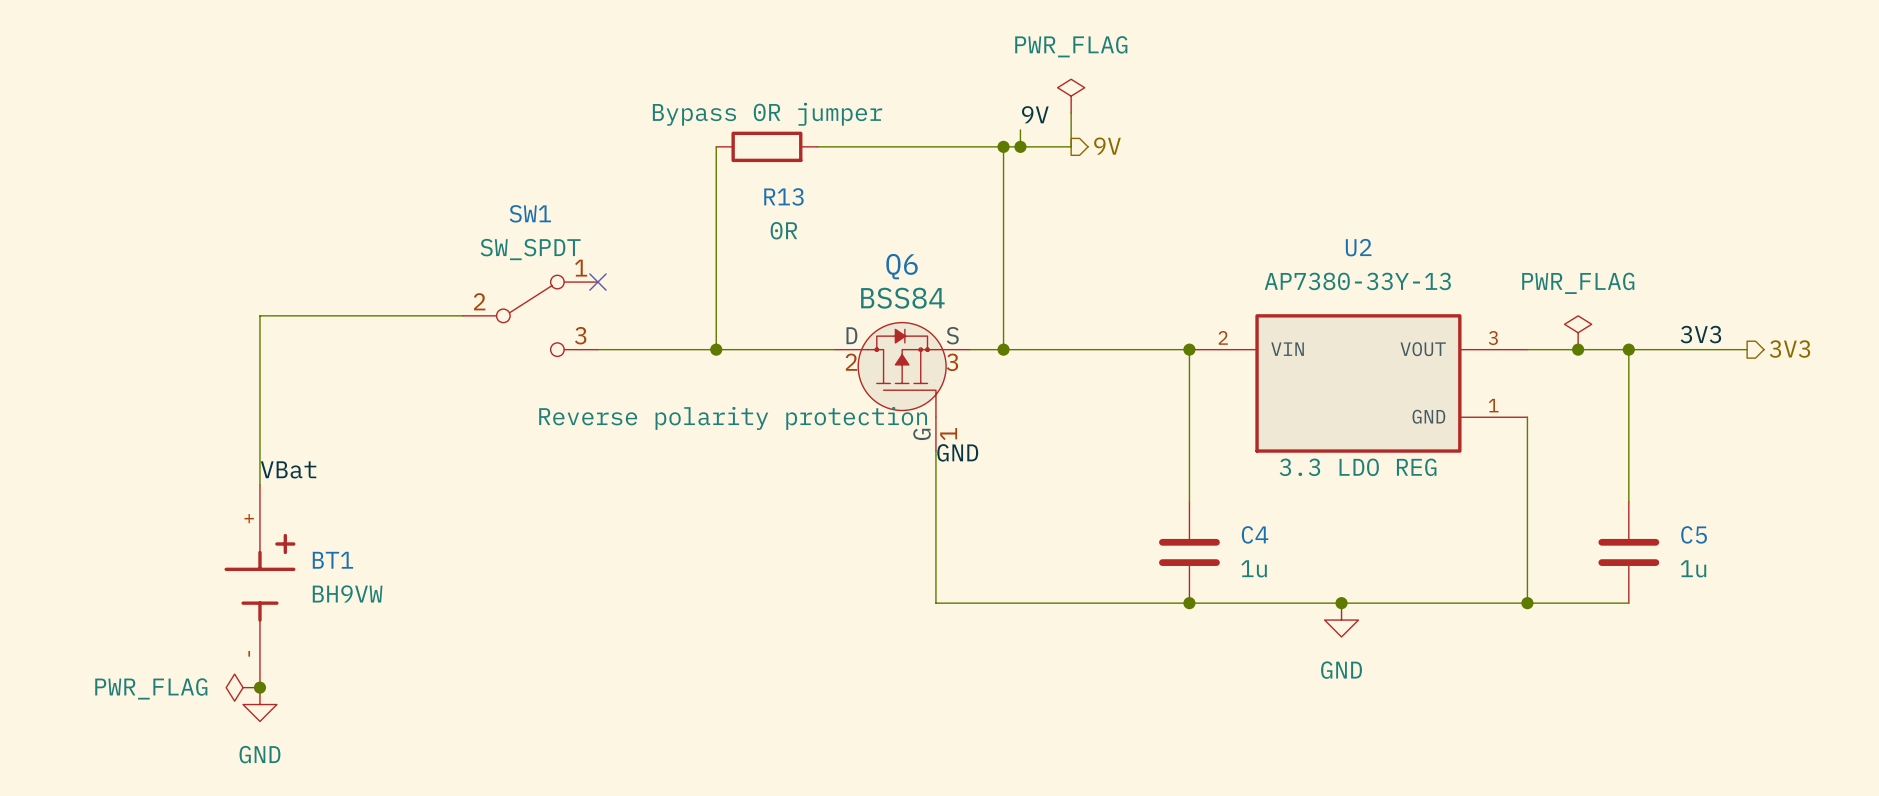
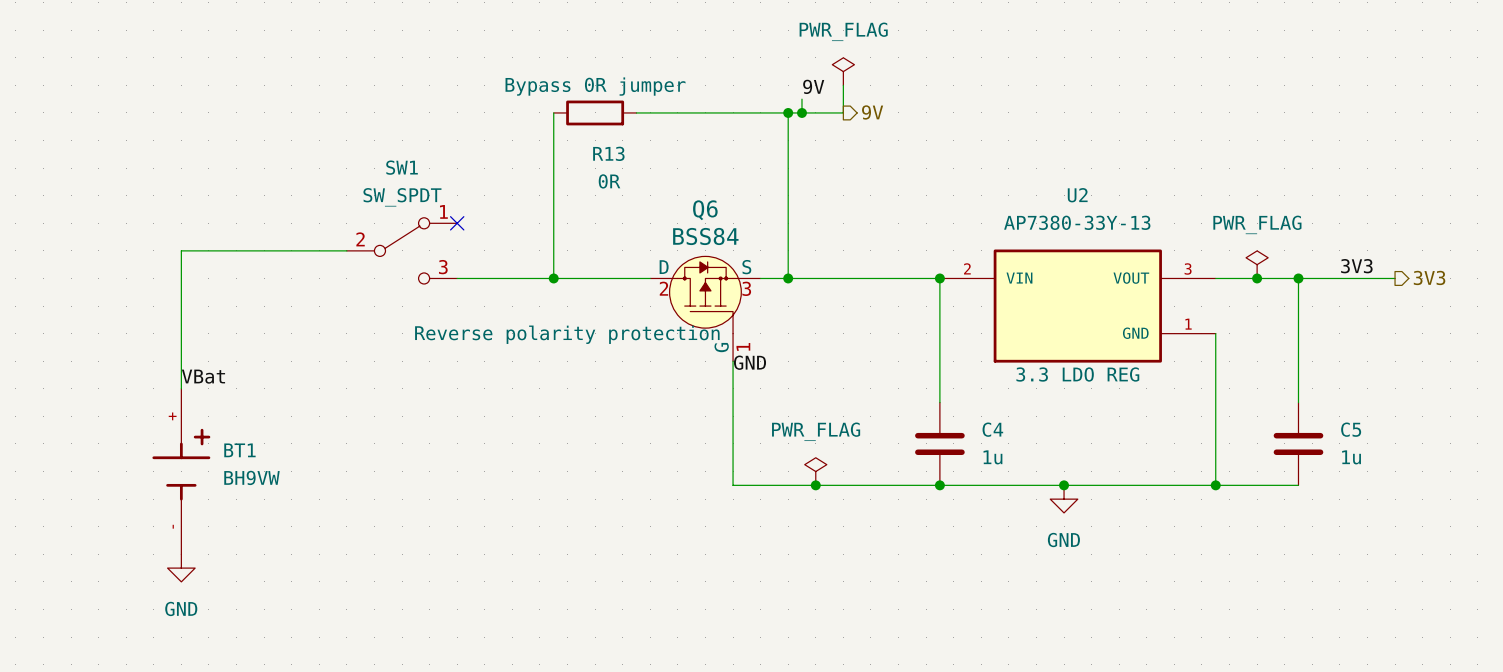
power symbol: none -> PWR_FLAG (815, 471)
junction: none -> (815, 485)
power symbol: PWR_FLAG (243, 687) -> none
junction: (259, 687) -> none

